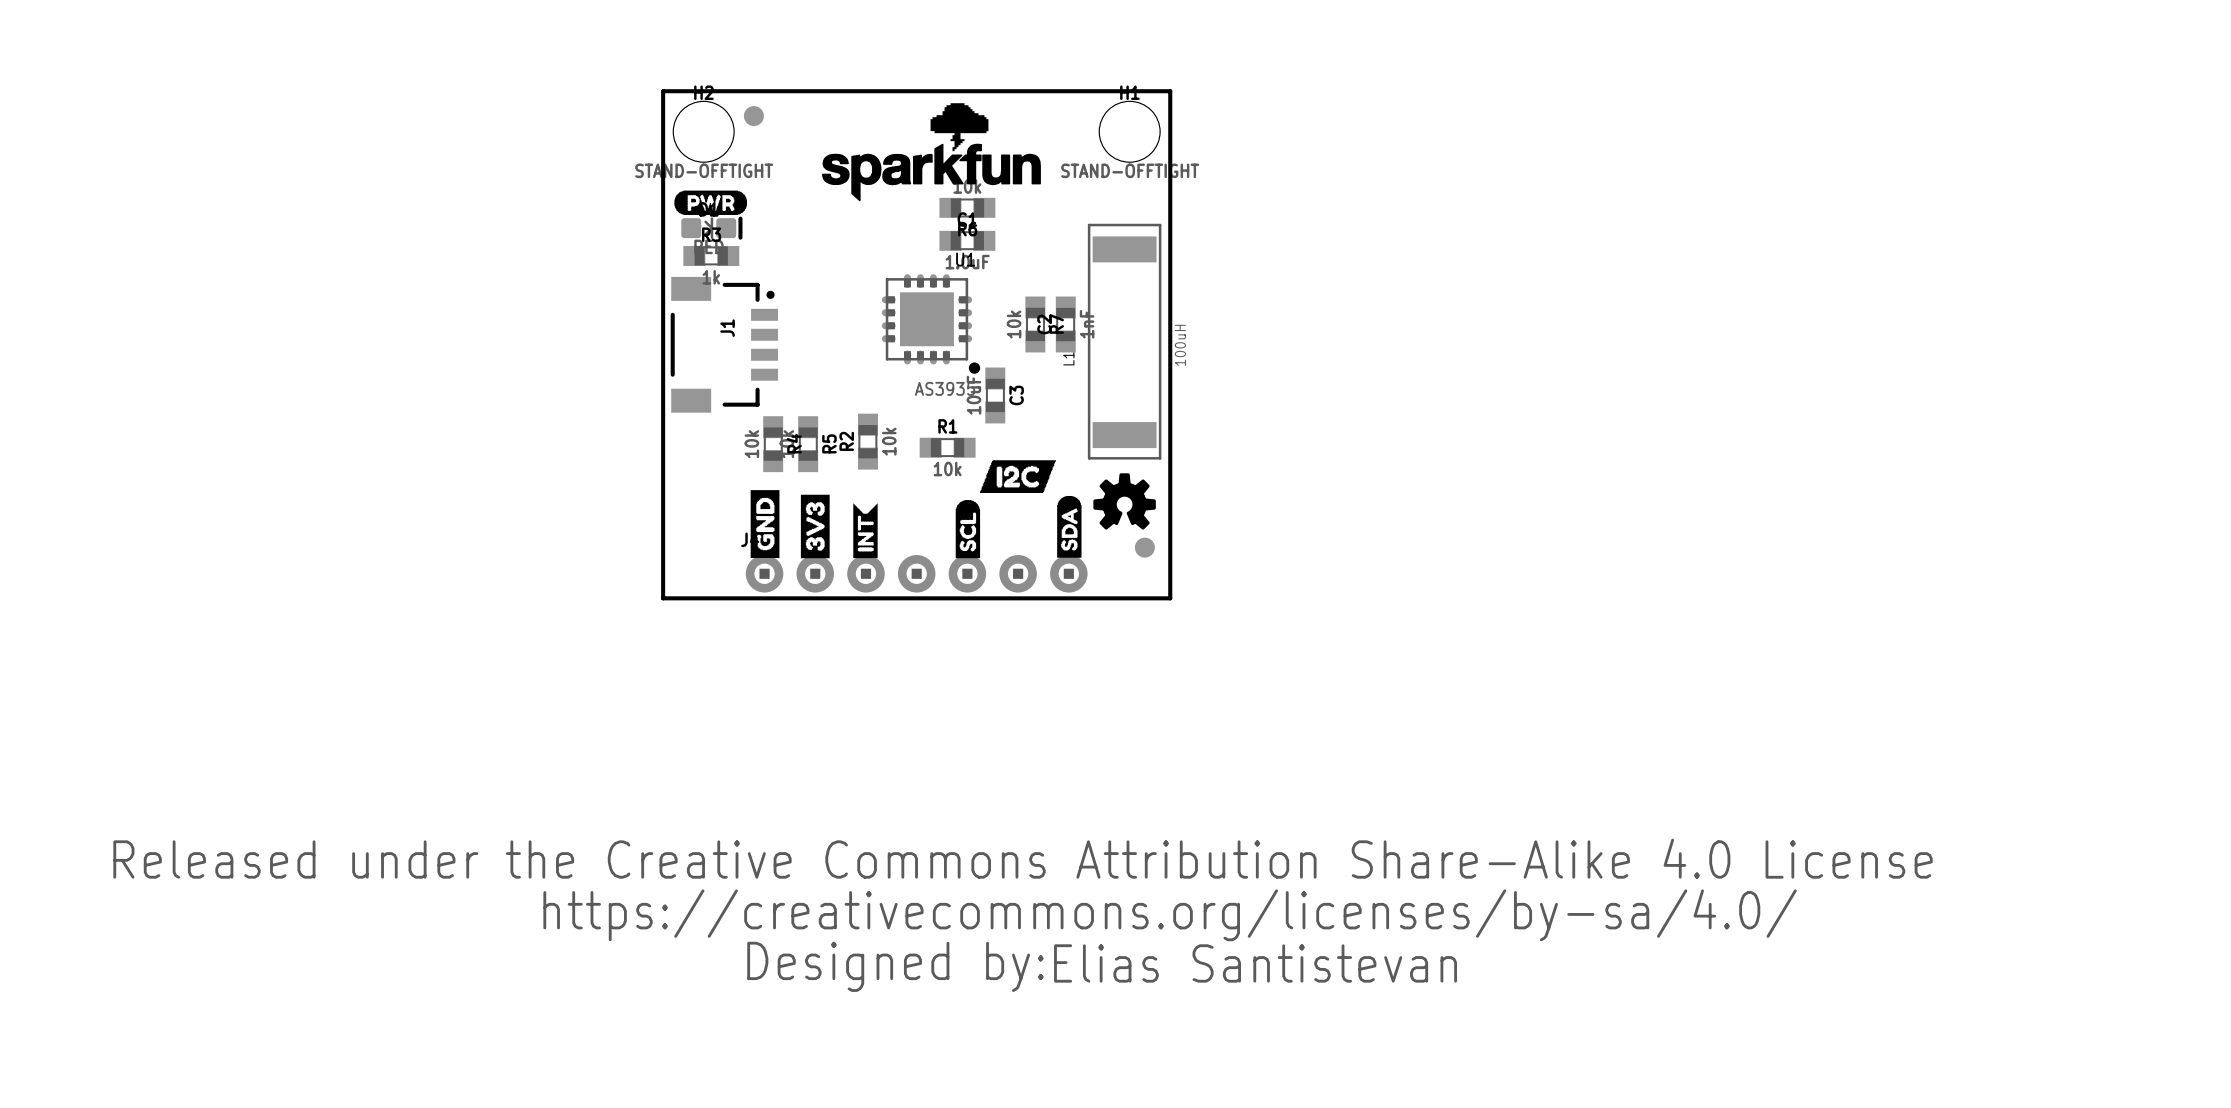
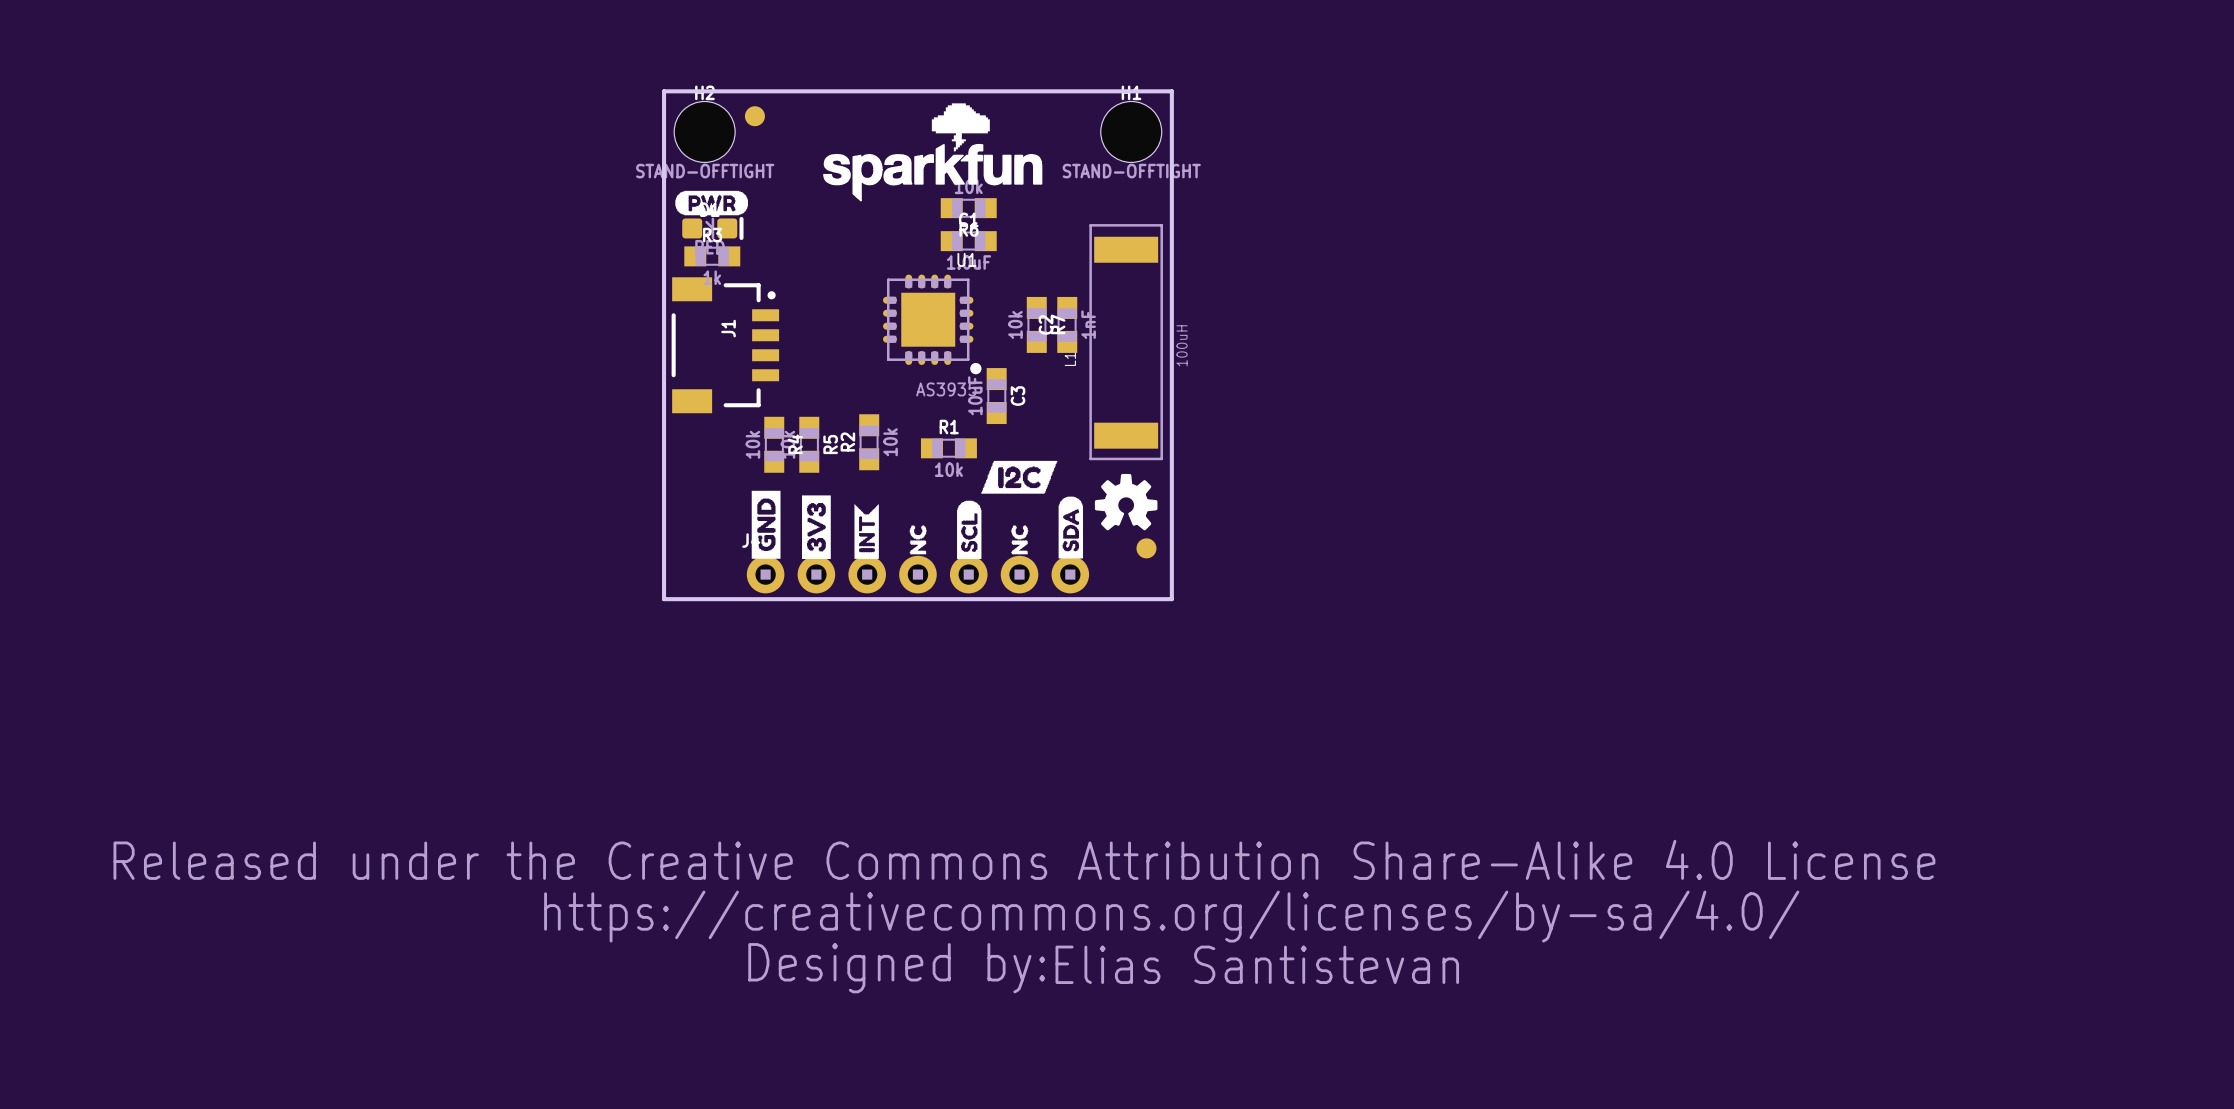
drawing: none -> [909, 525, 927, 555]
drawing: none -> [1011, 525, 1029, 555]

